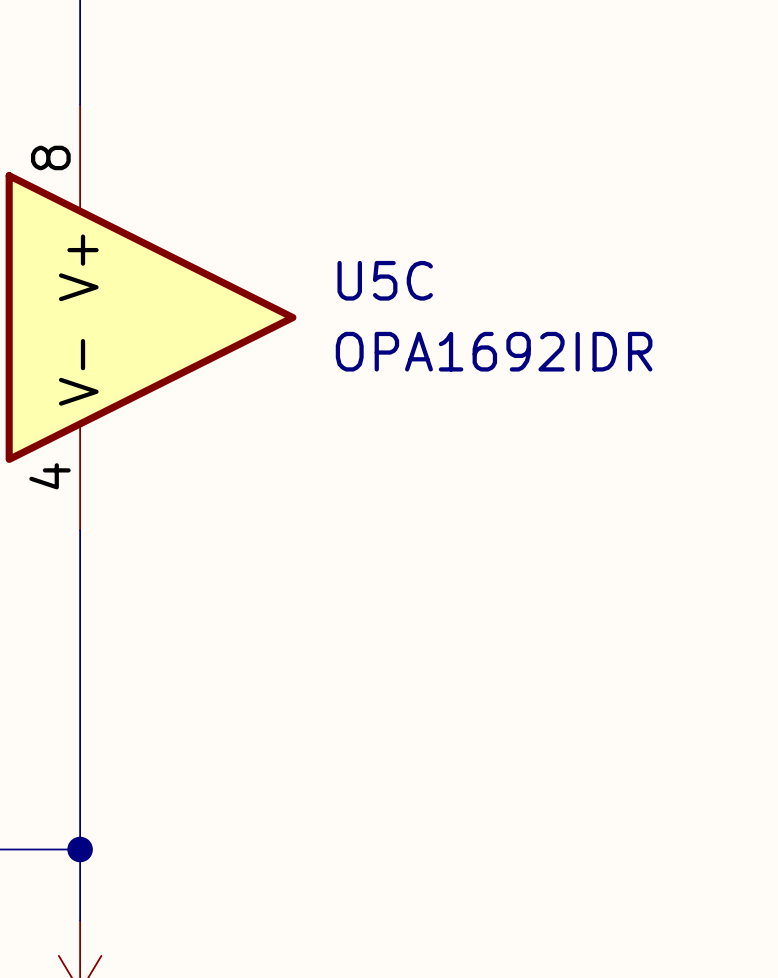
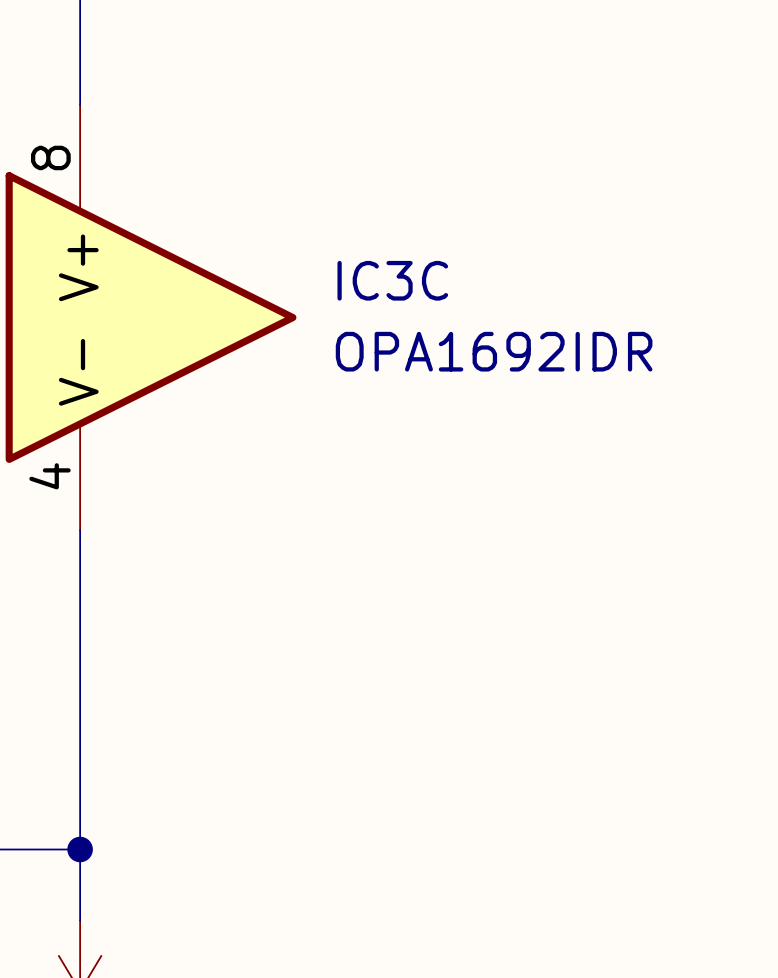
U5C name: U5C (385, 280) -> IC3C (392, 280)

